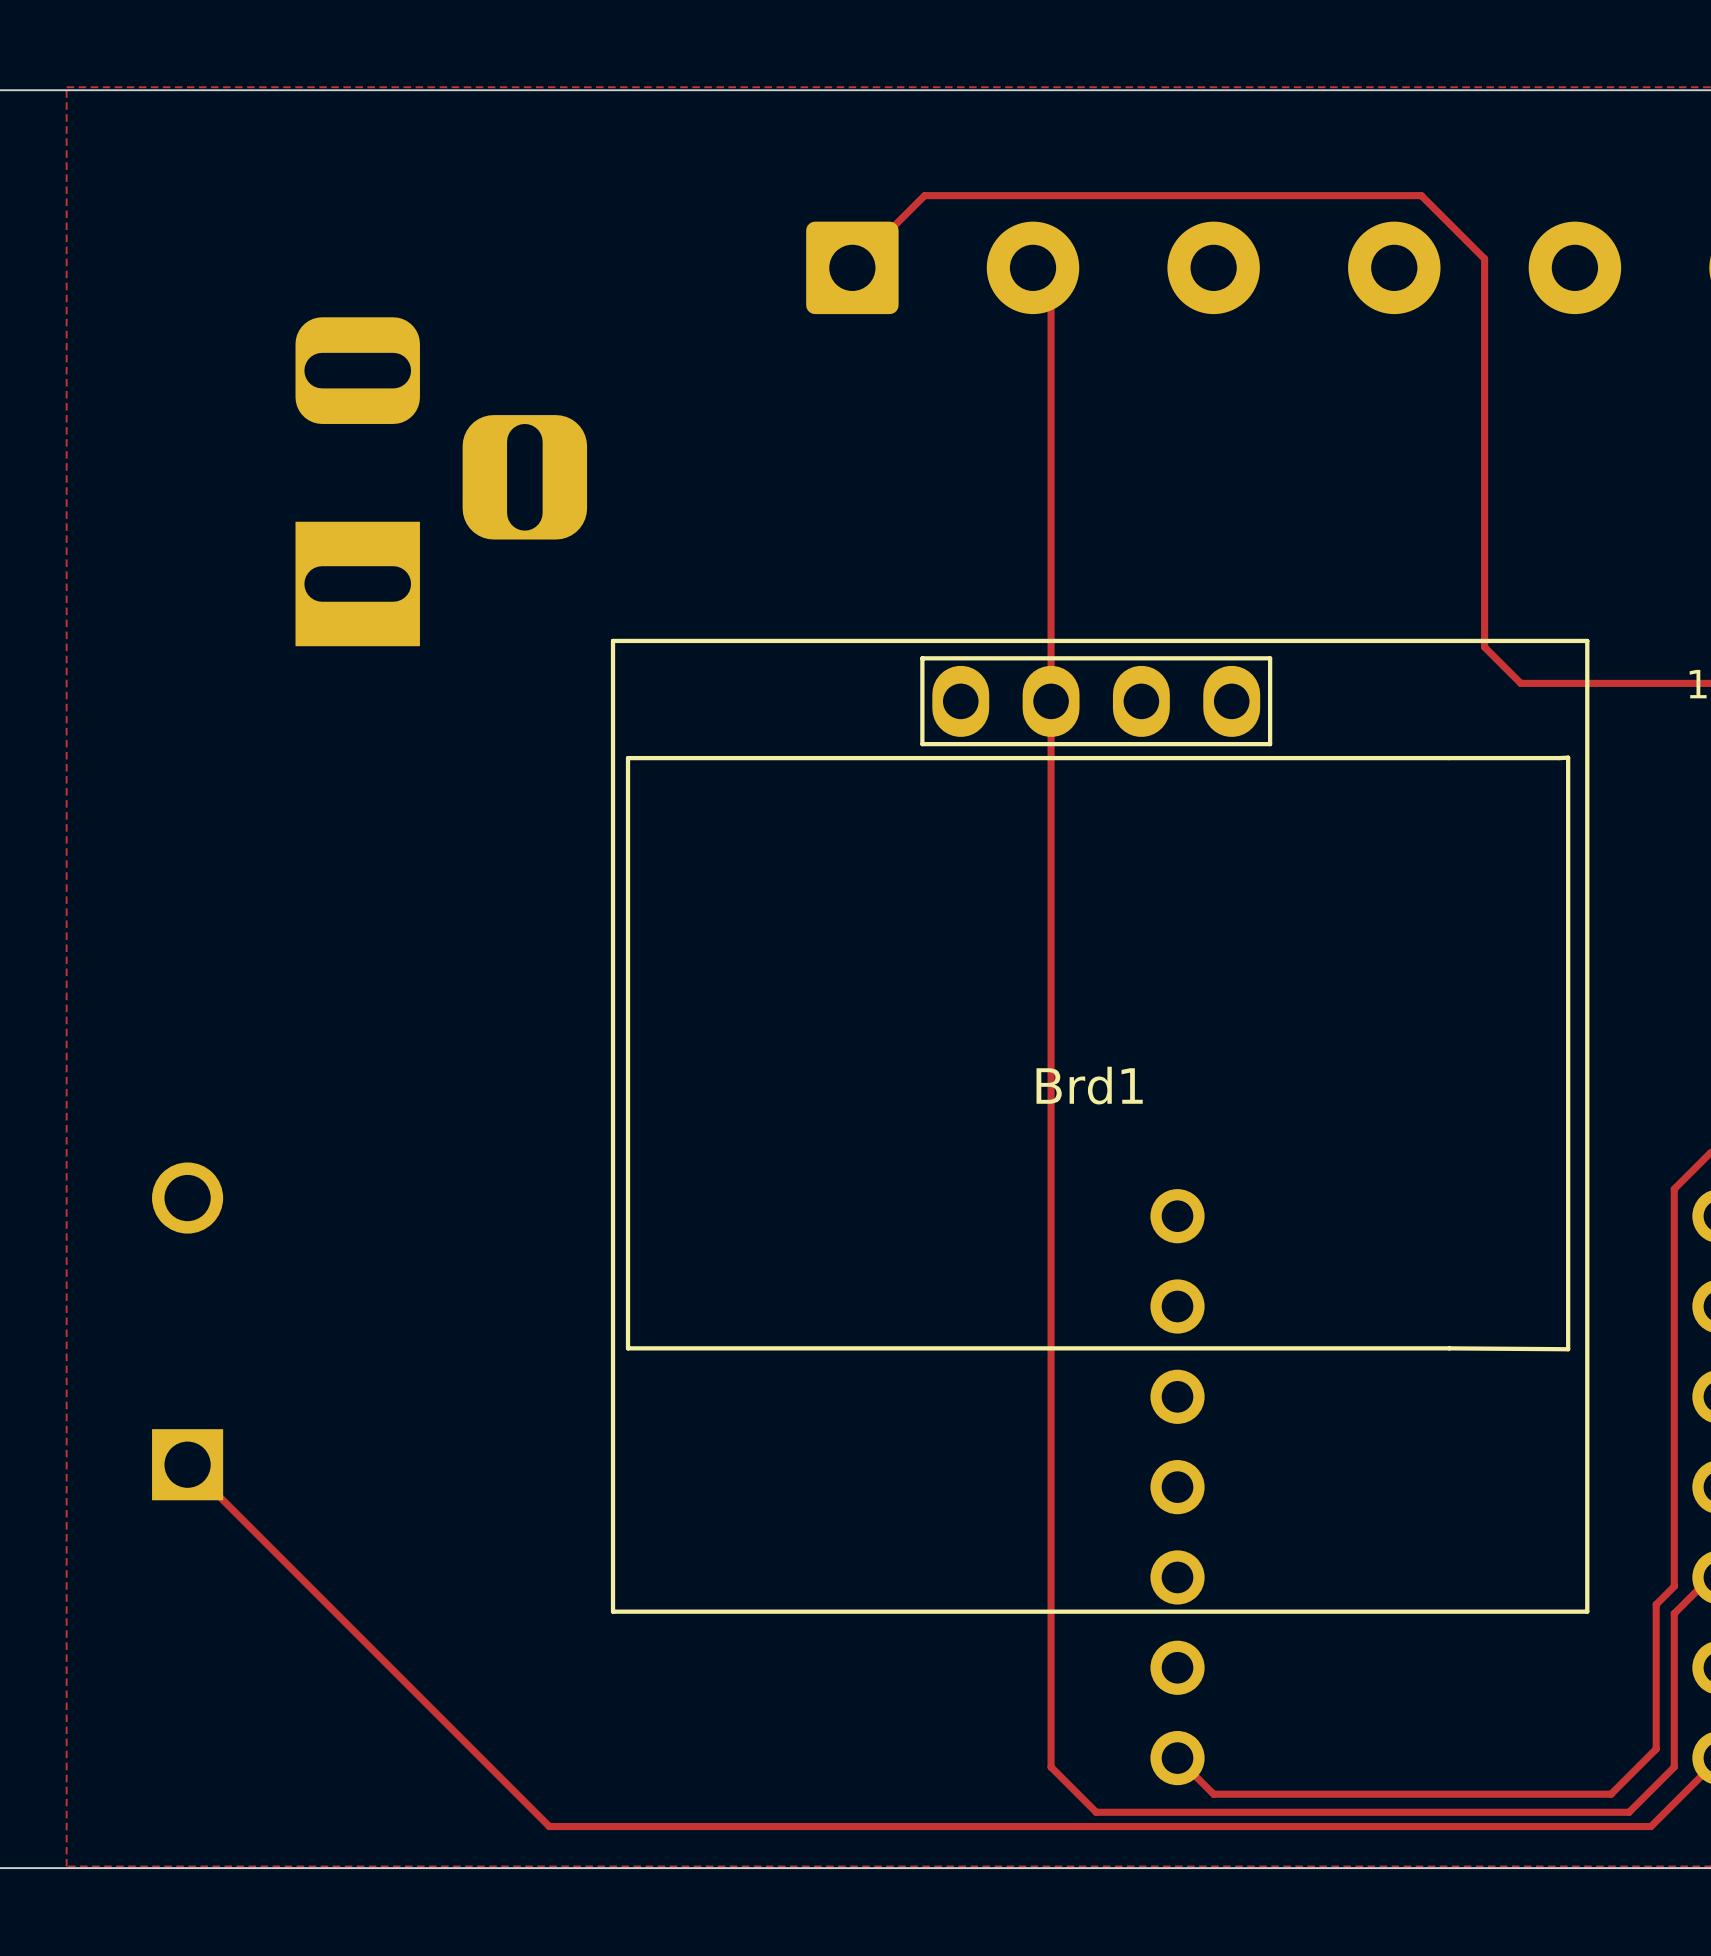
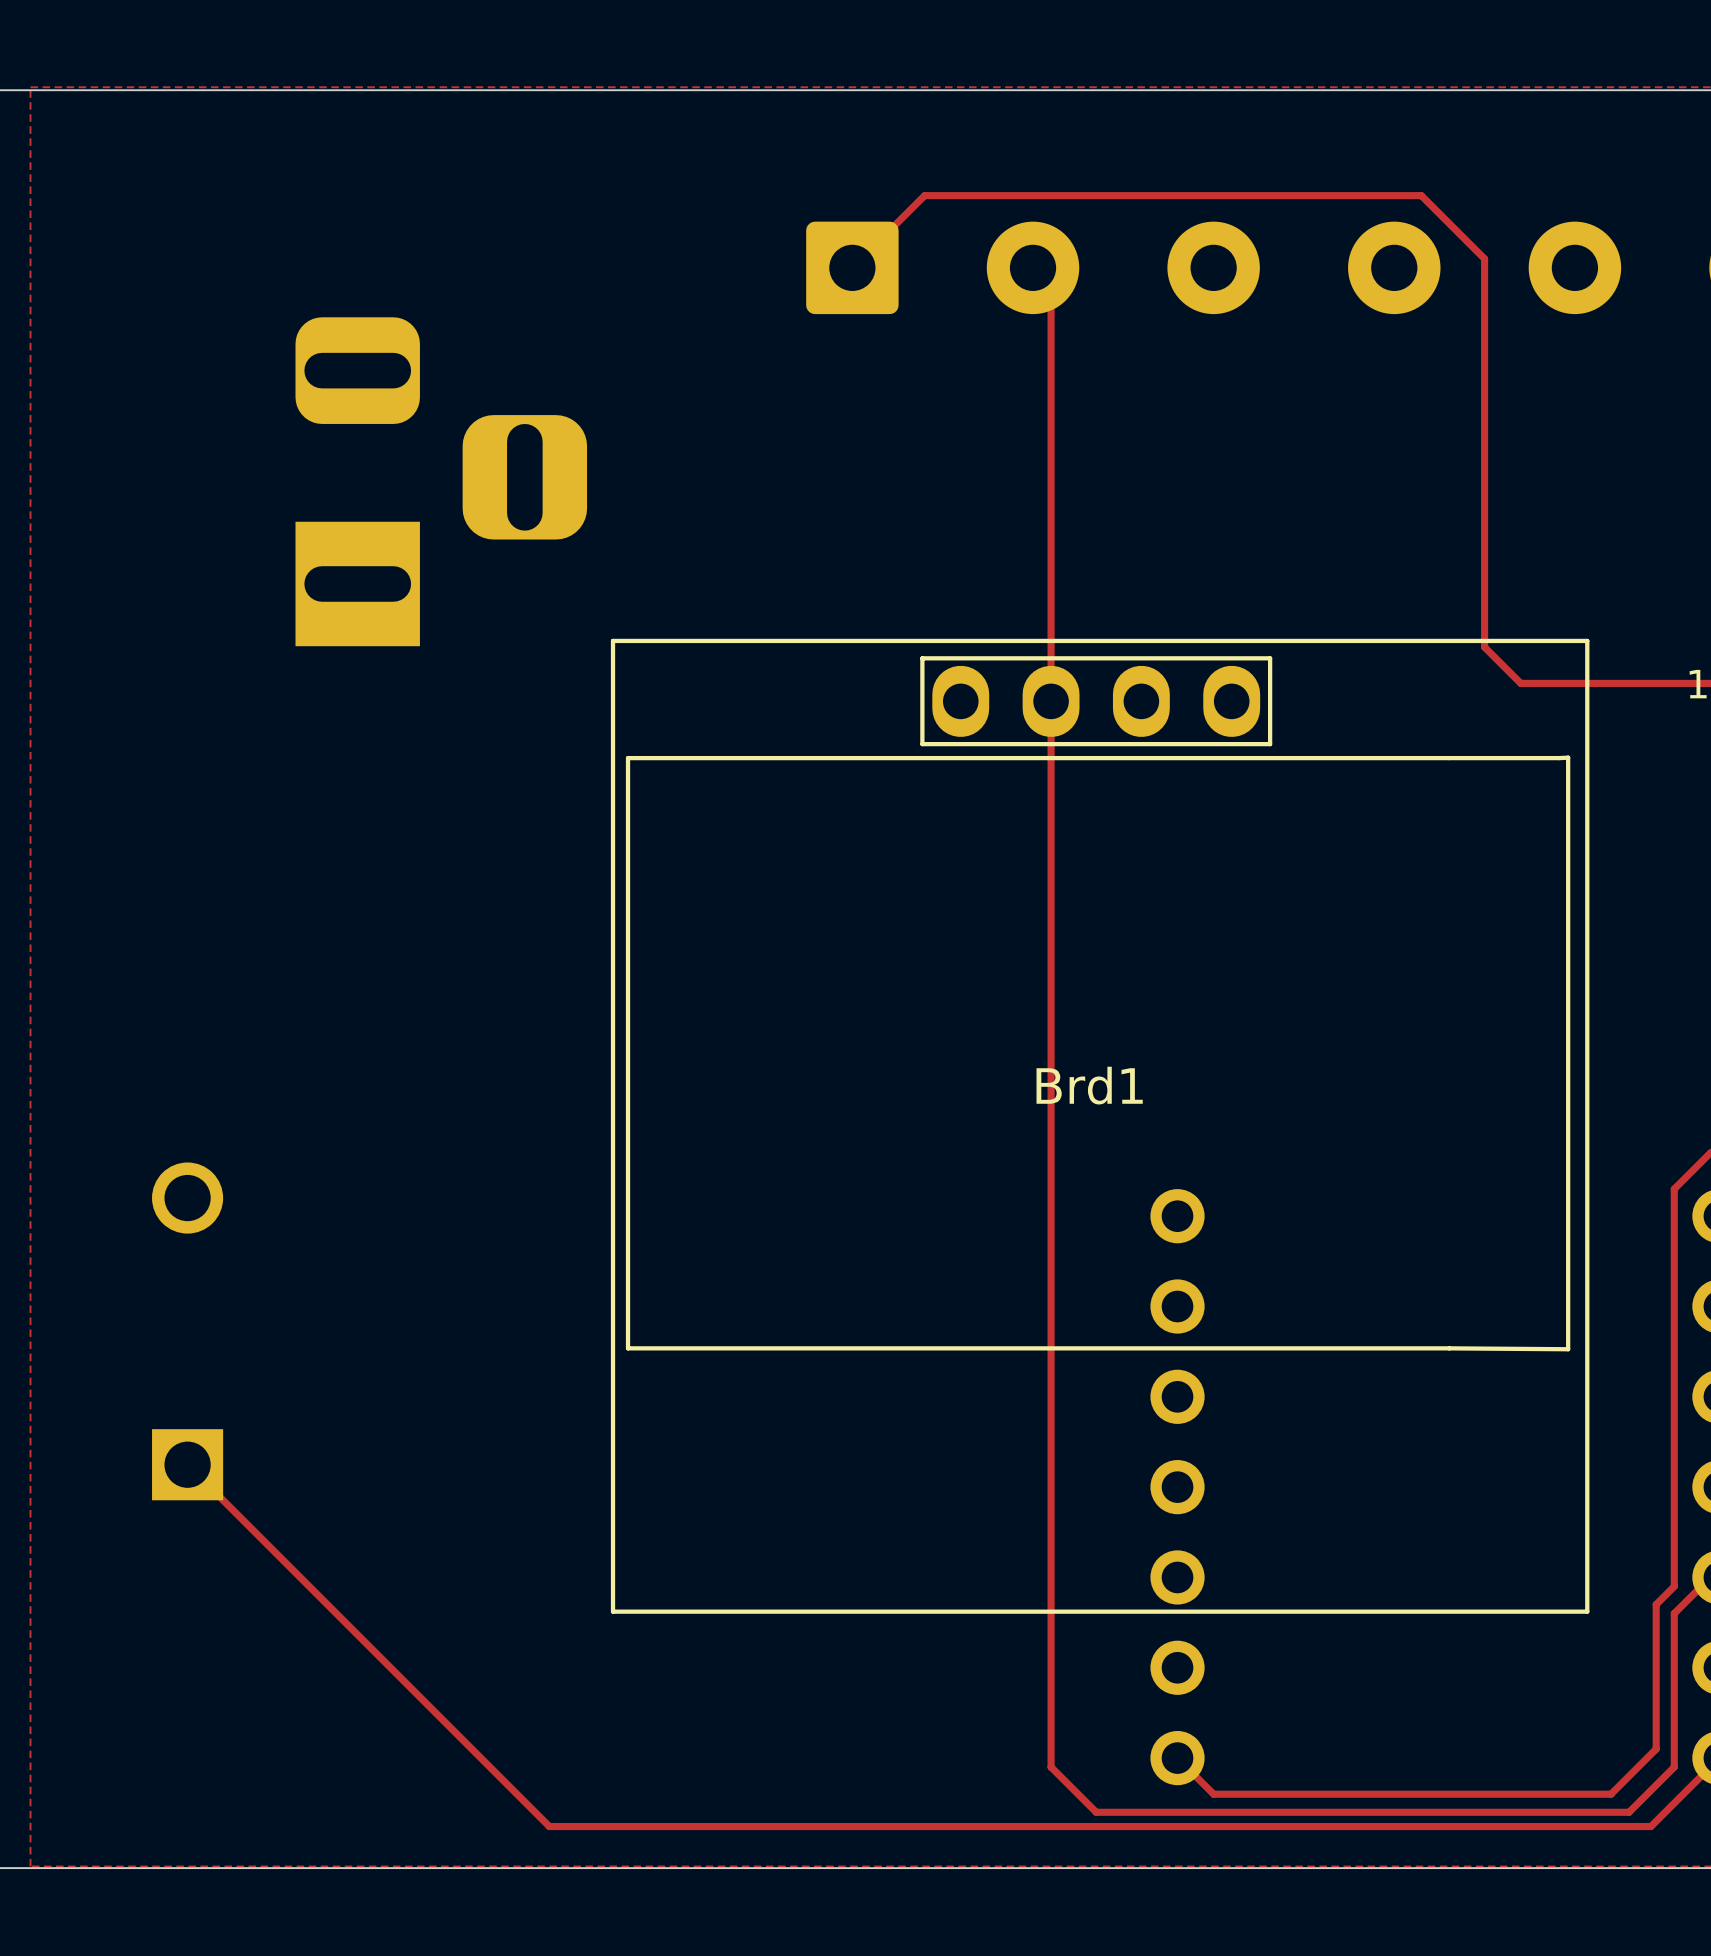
zone outline: (66, 87) (66, 1866) -> (66, 87) (30, 87) (30, 1866) (66, 1866)

